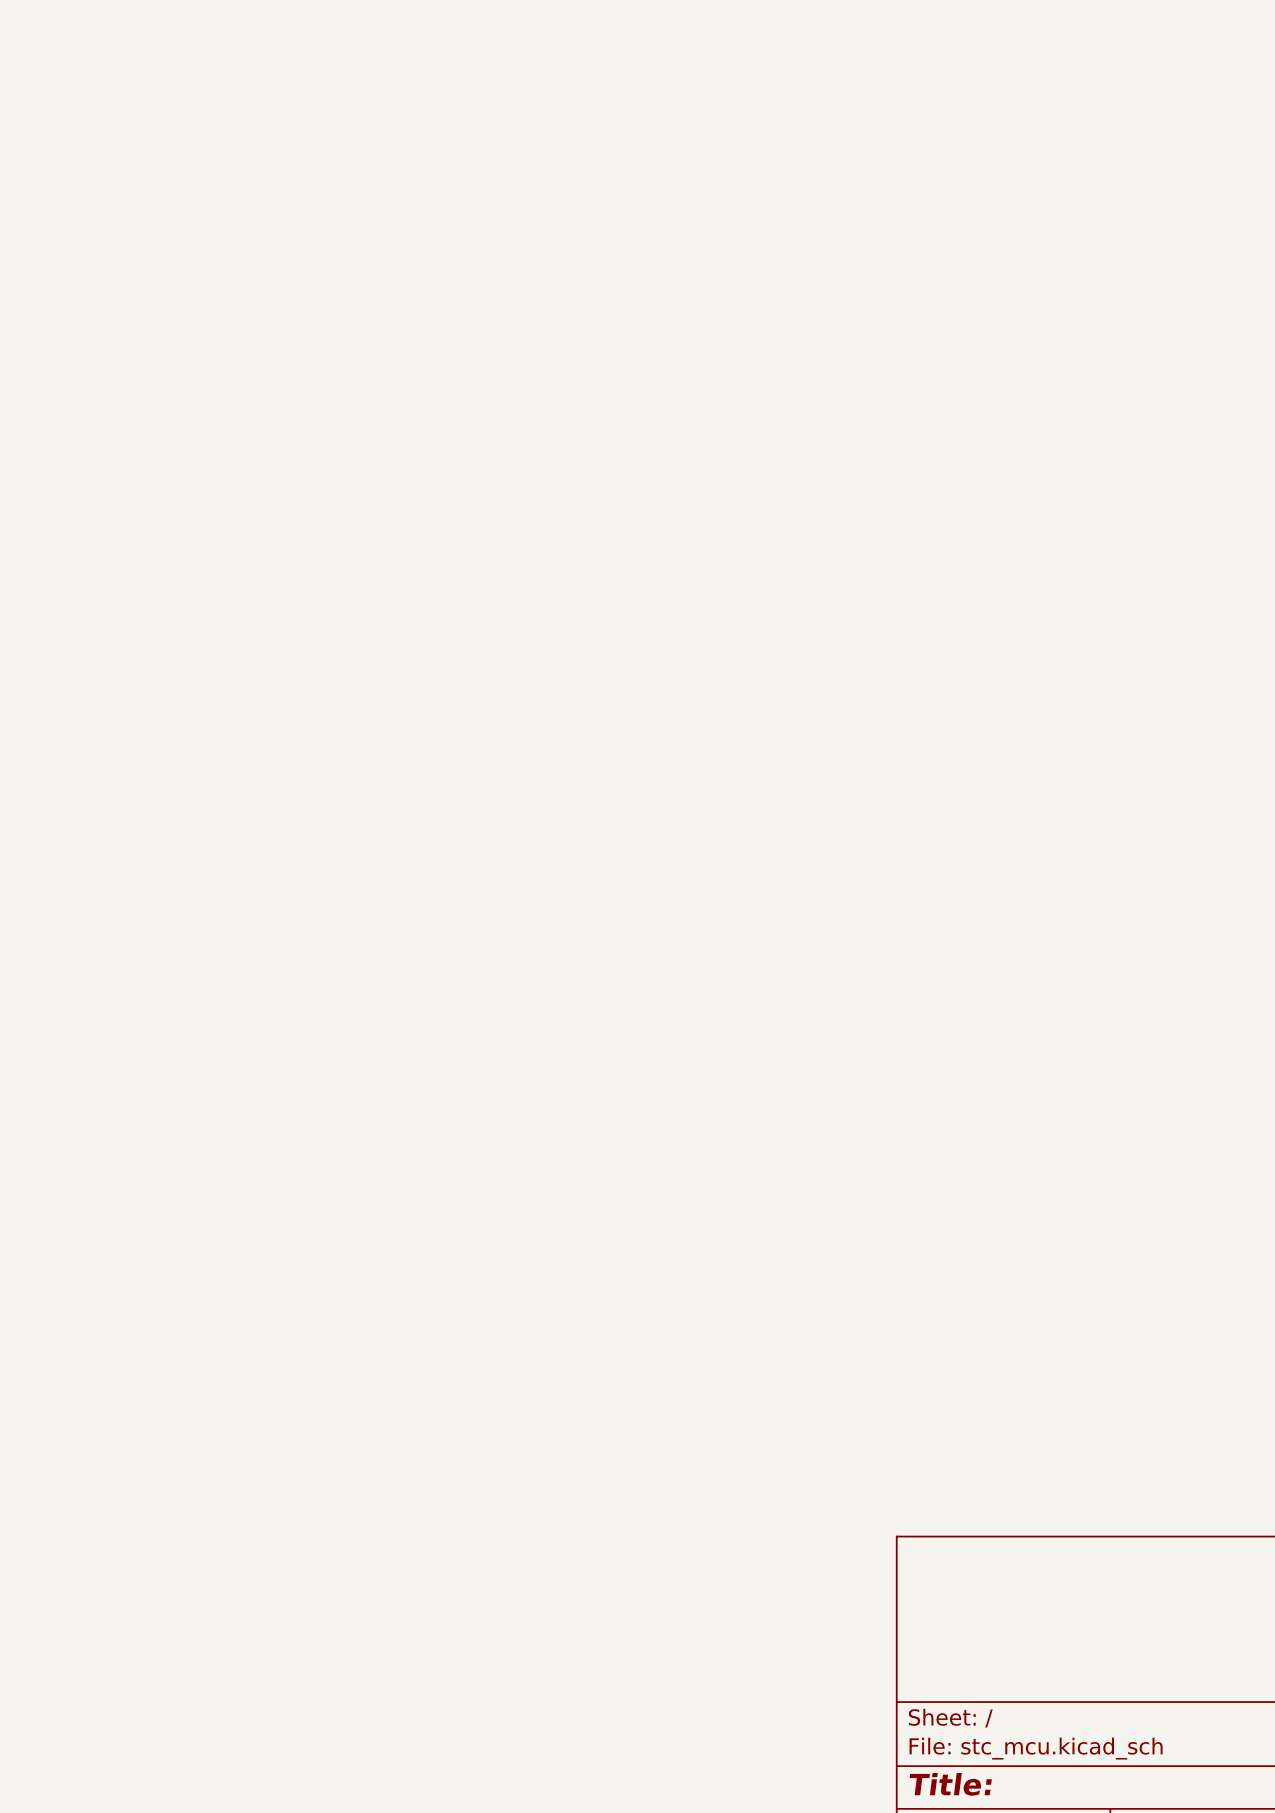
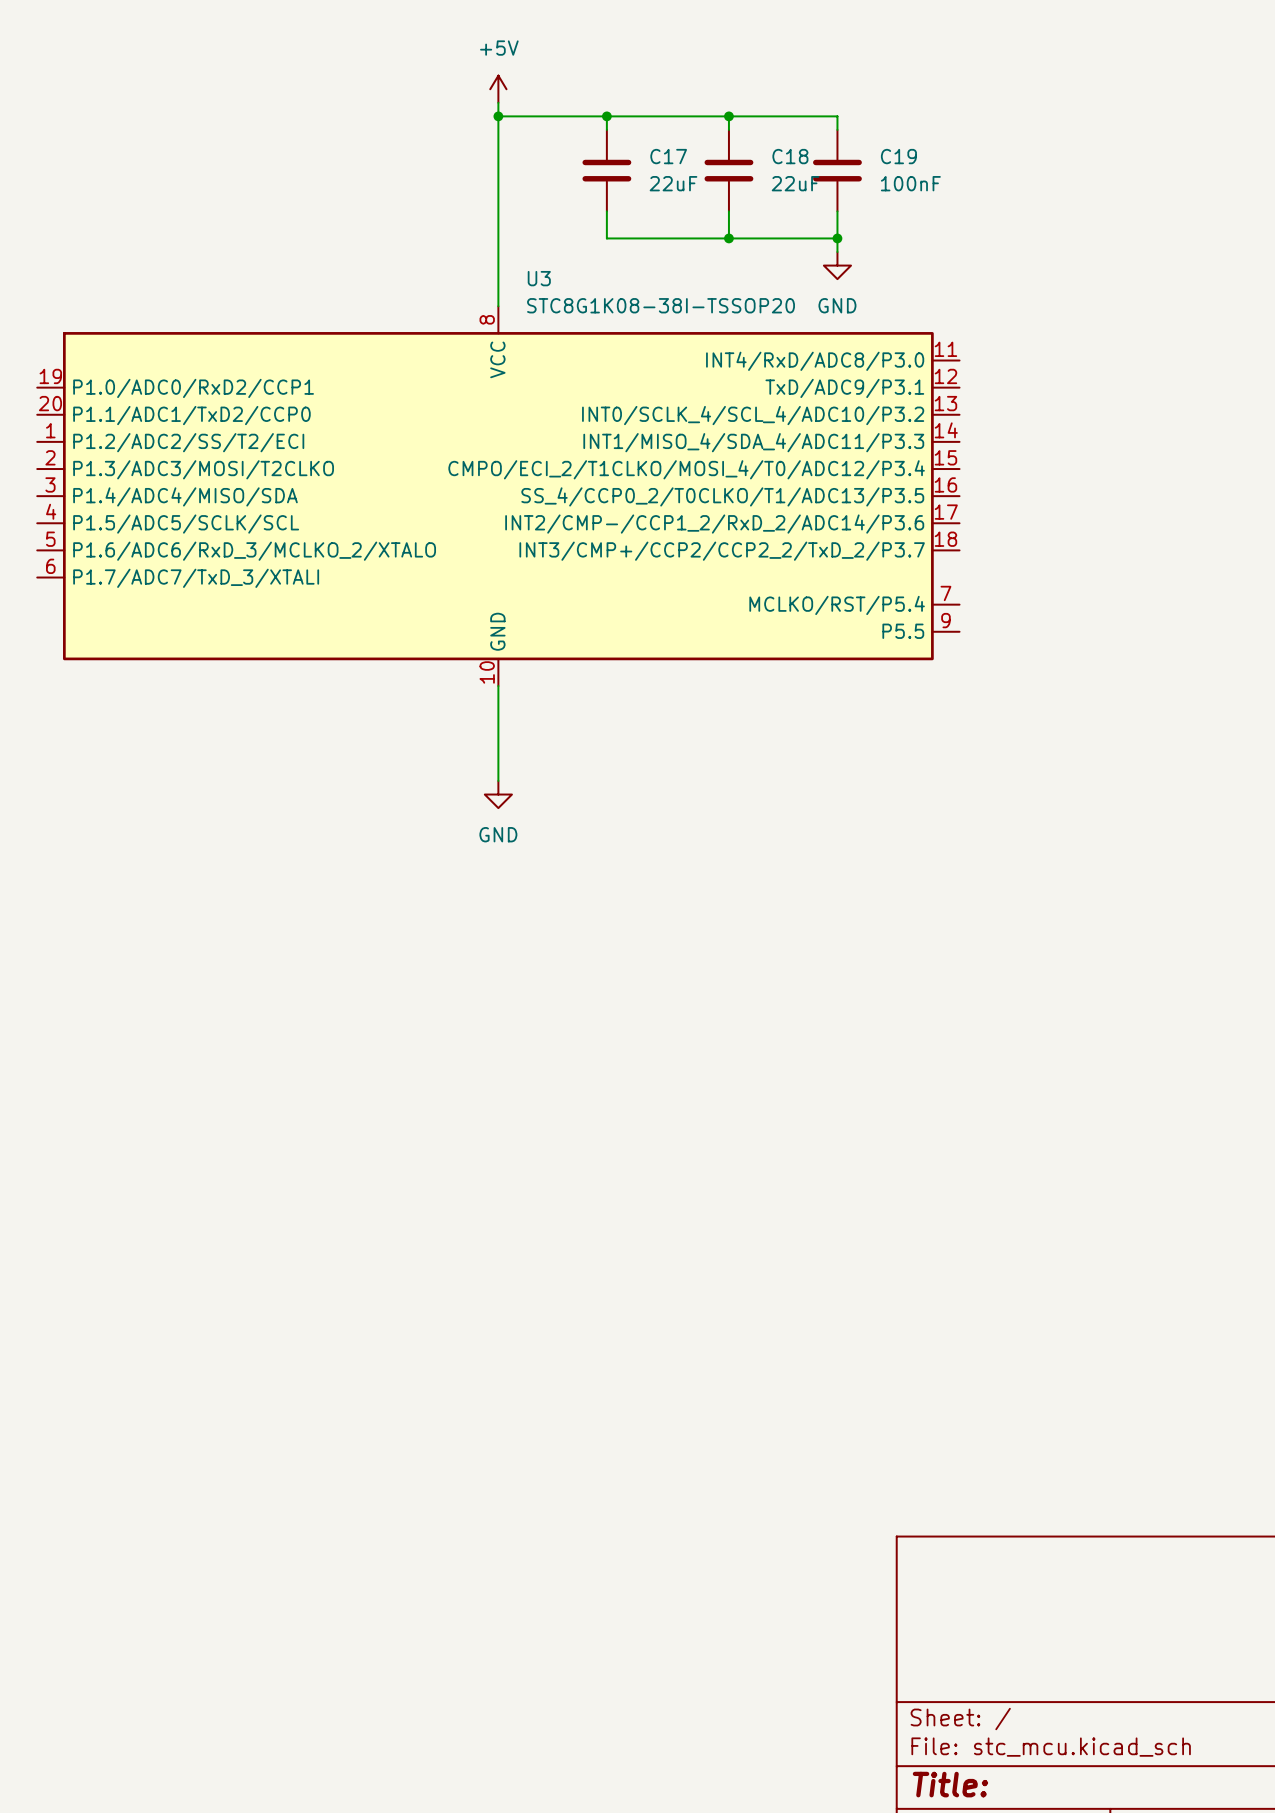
power symbol: none -> +5V (498, 89)
wire: none -> (498, 102) (498, 306)
wire: none -> (498, 116) (837, 116) (837, 129)
junction: none -> (498, 116)
wire: none -> (606, 116) (606, 129)
junction: none -> (606, 116)
wire: none -> (728, 116) (728, 129)
junction: none -> (728, 116)
C17: none -> 22uF (606, 170)
C18: none -> 22uF (728, 170)
C19: none -> 100nF (837, 170)
wire: none -> (606, 211) (606, 238) (837, 238)
wire: none -> (728, 211) (728, 238)
wire: none -> (837, 211) (837, 252)
junction: none -> (728, 238)
junction: none -> (837, 238)
power symbol: none -> GND (837, 265)
U3: none -> STC8G1K08-38I-TSSOP20 (498, 496)
wire: none -> (498, 686) (498, 780)
power symbol: none -> GND (498, 794)

